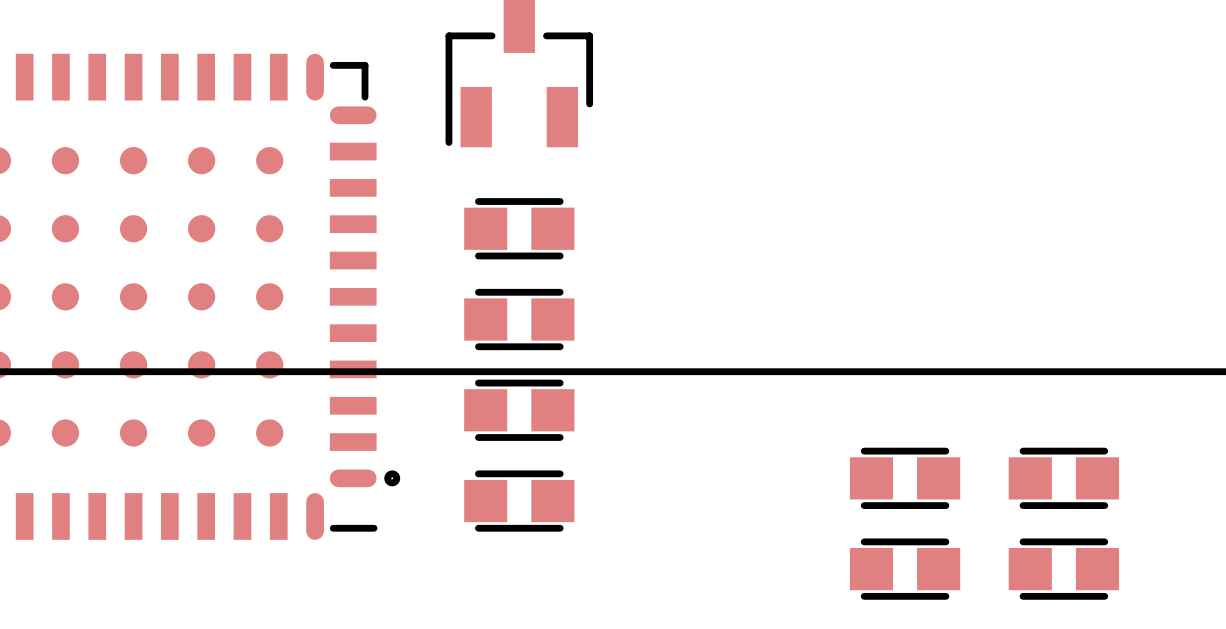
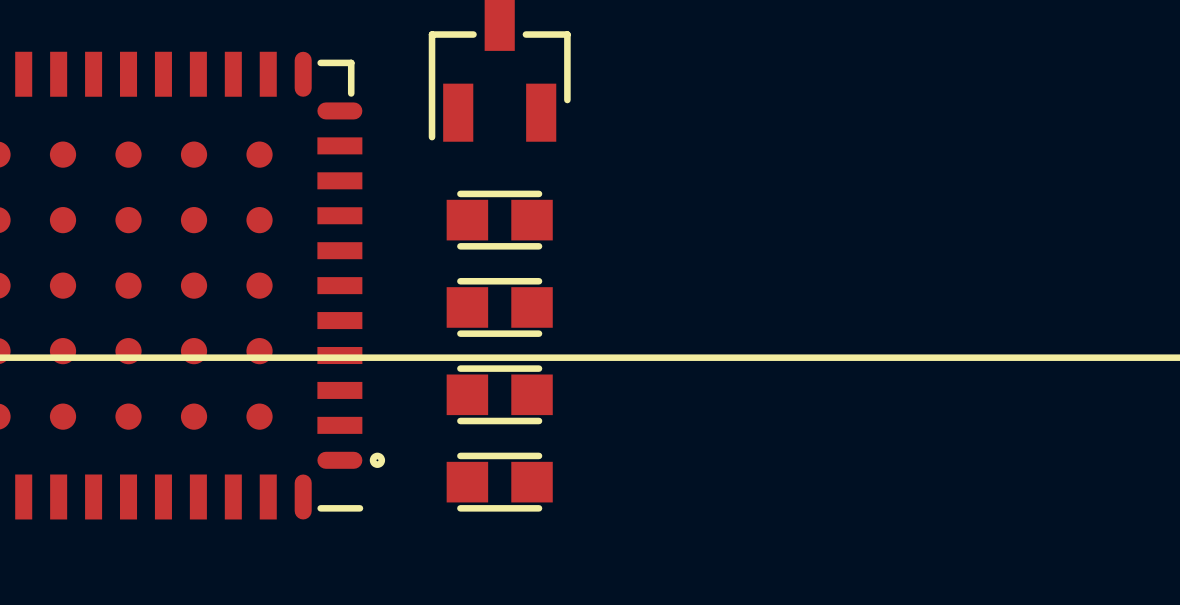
part: (905, 478) -> none
part: (1063, 478) -> none
part: (905, 569) -> none
part: (1063, 569) -> none

